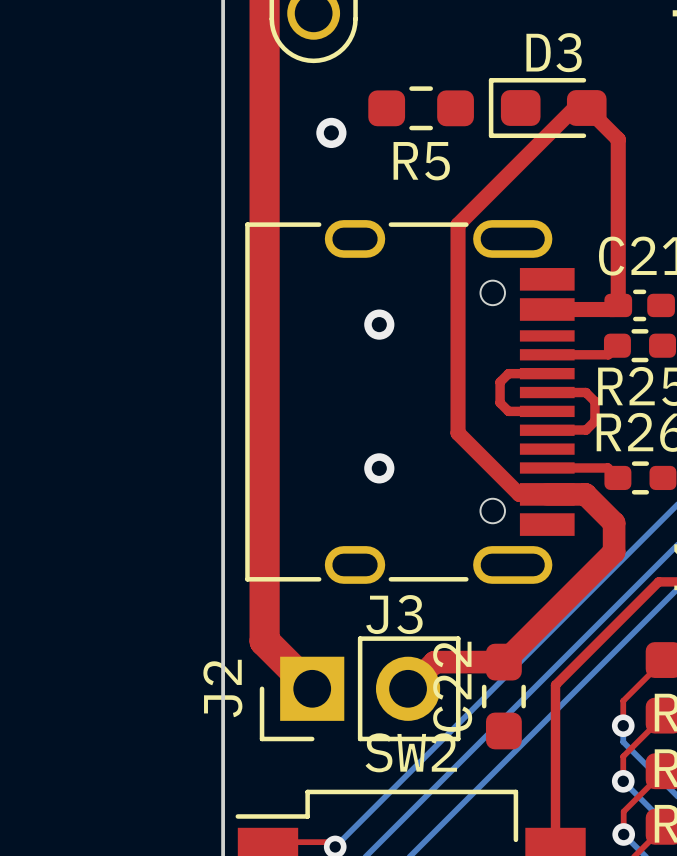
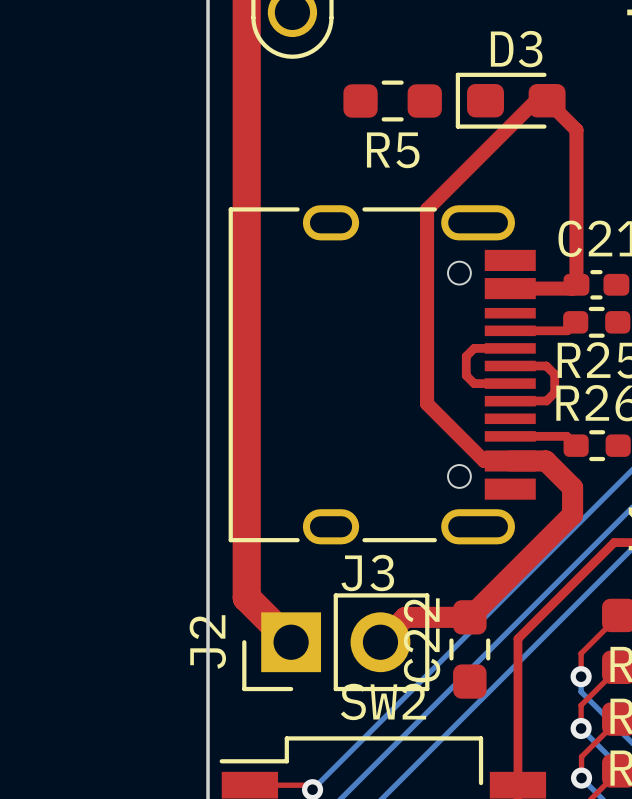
via: (331, 132) -> none
via: (379, 324) -> none
via: (379, 468) -> none

